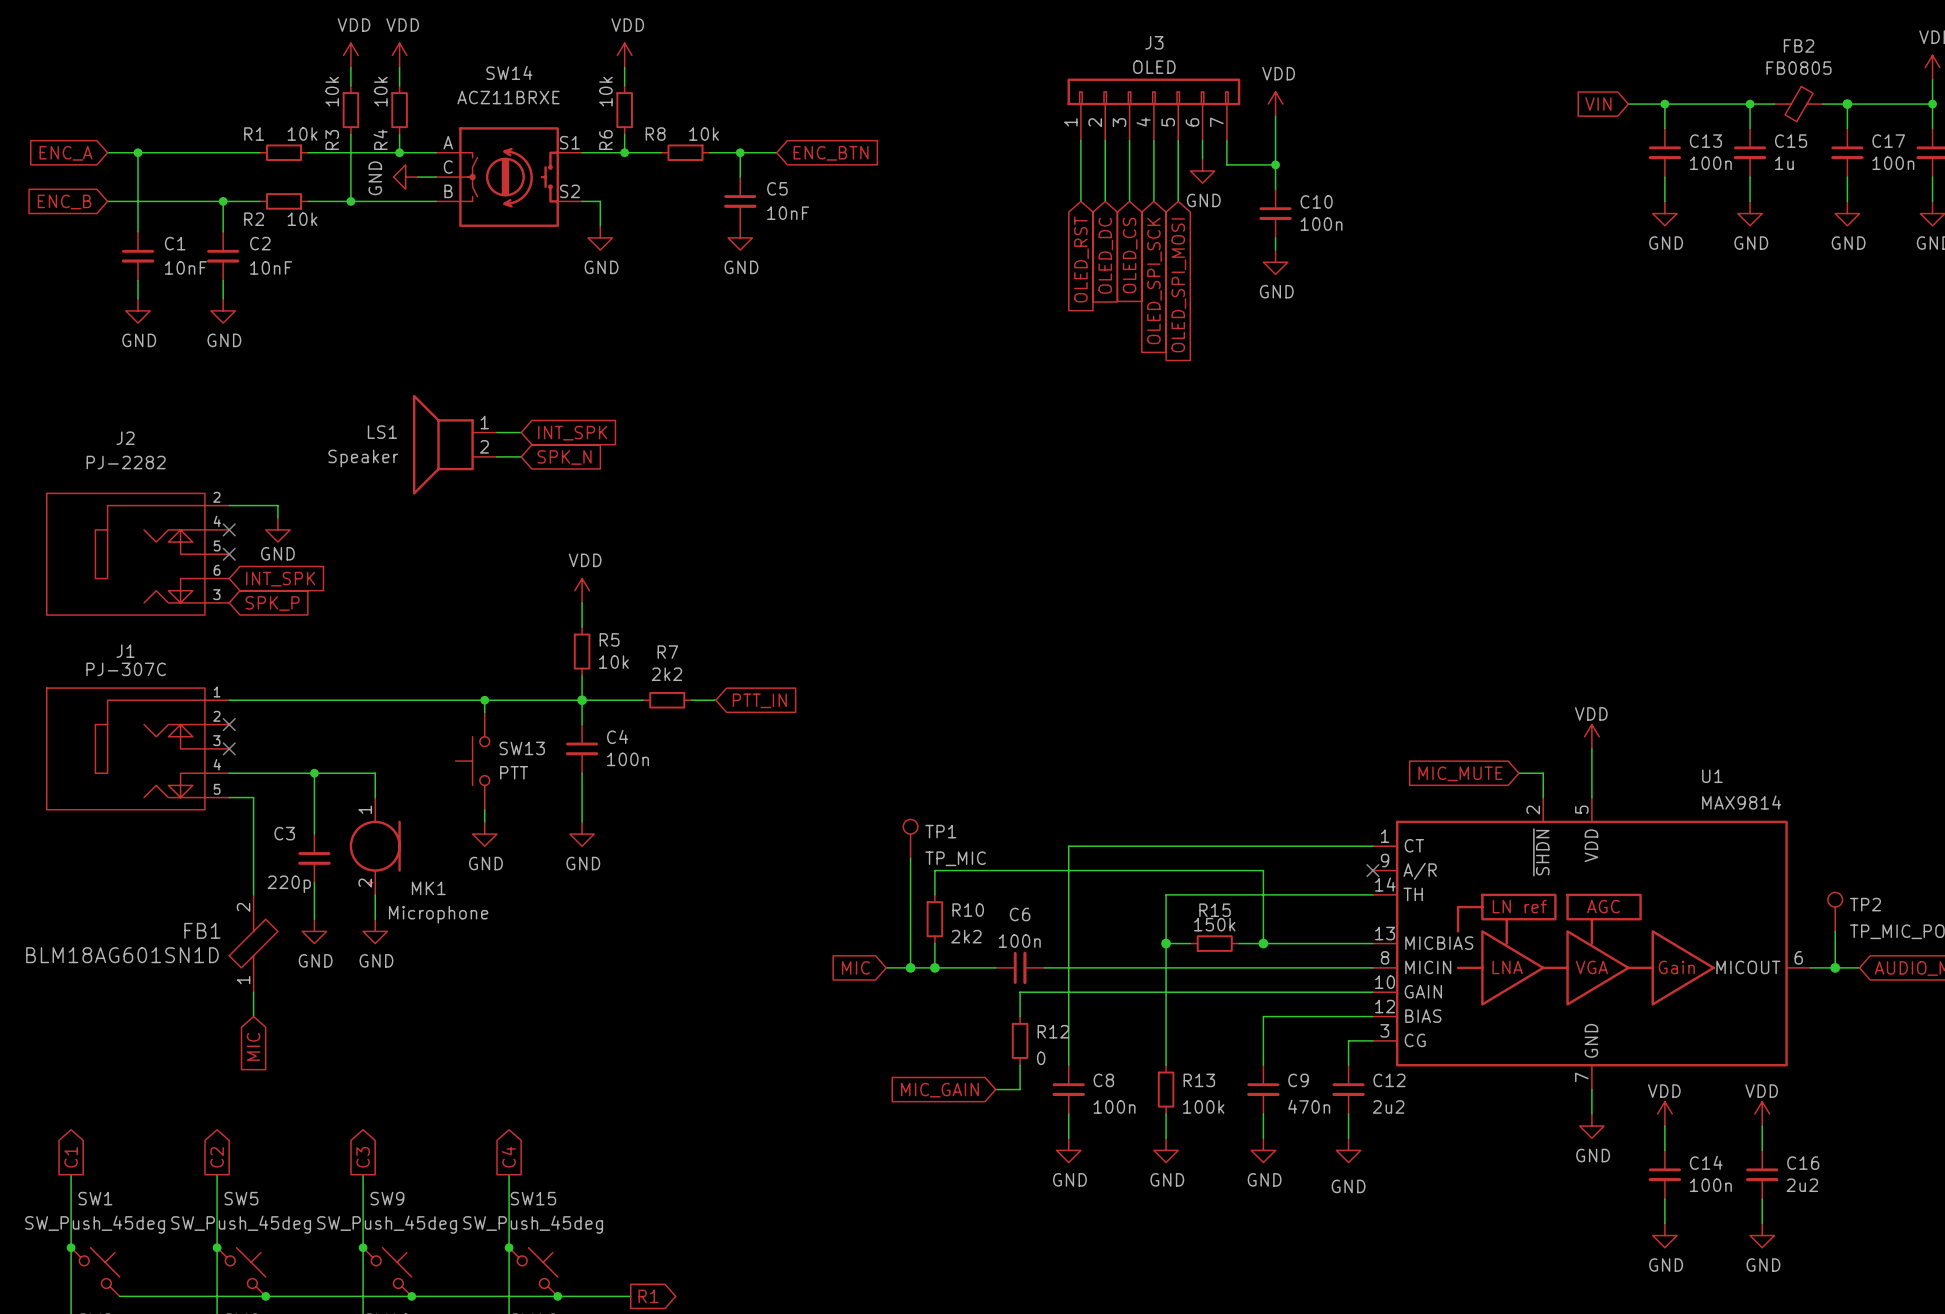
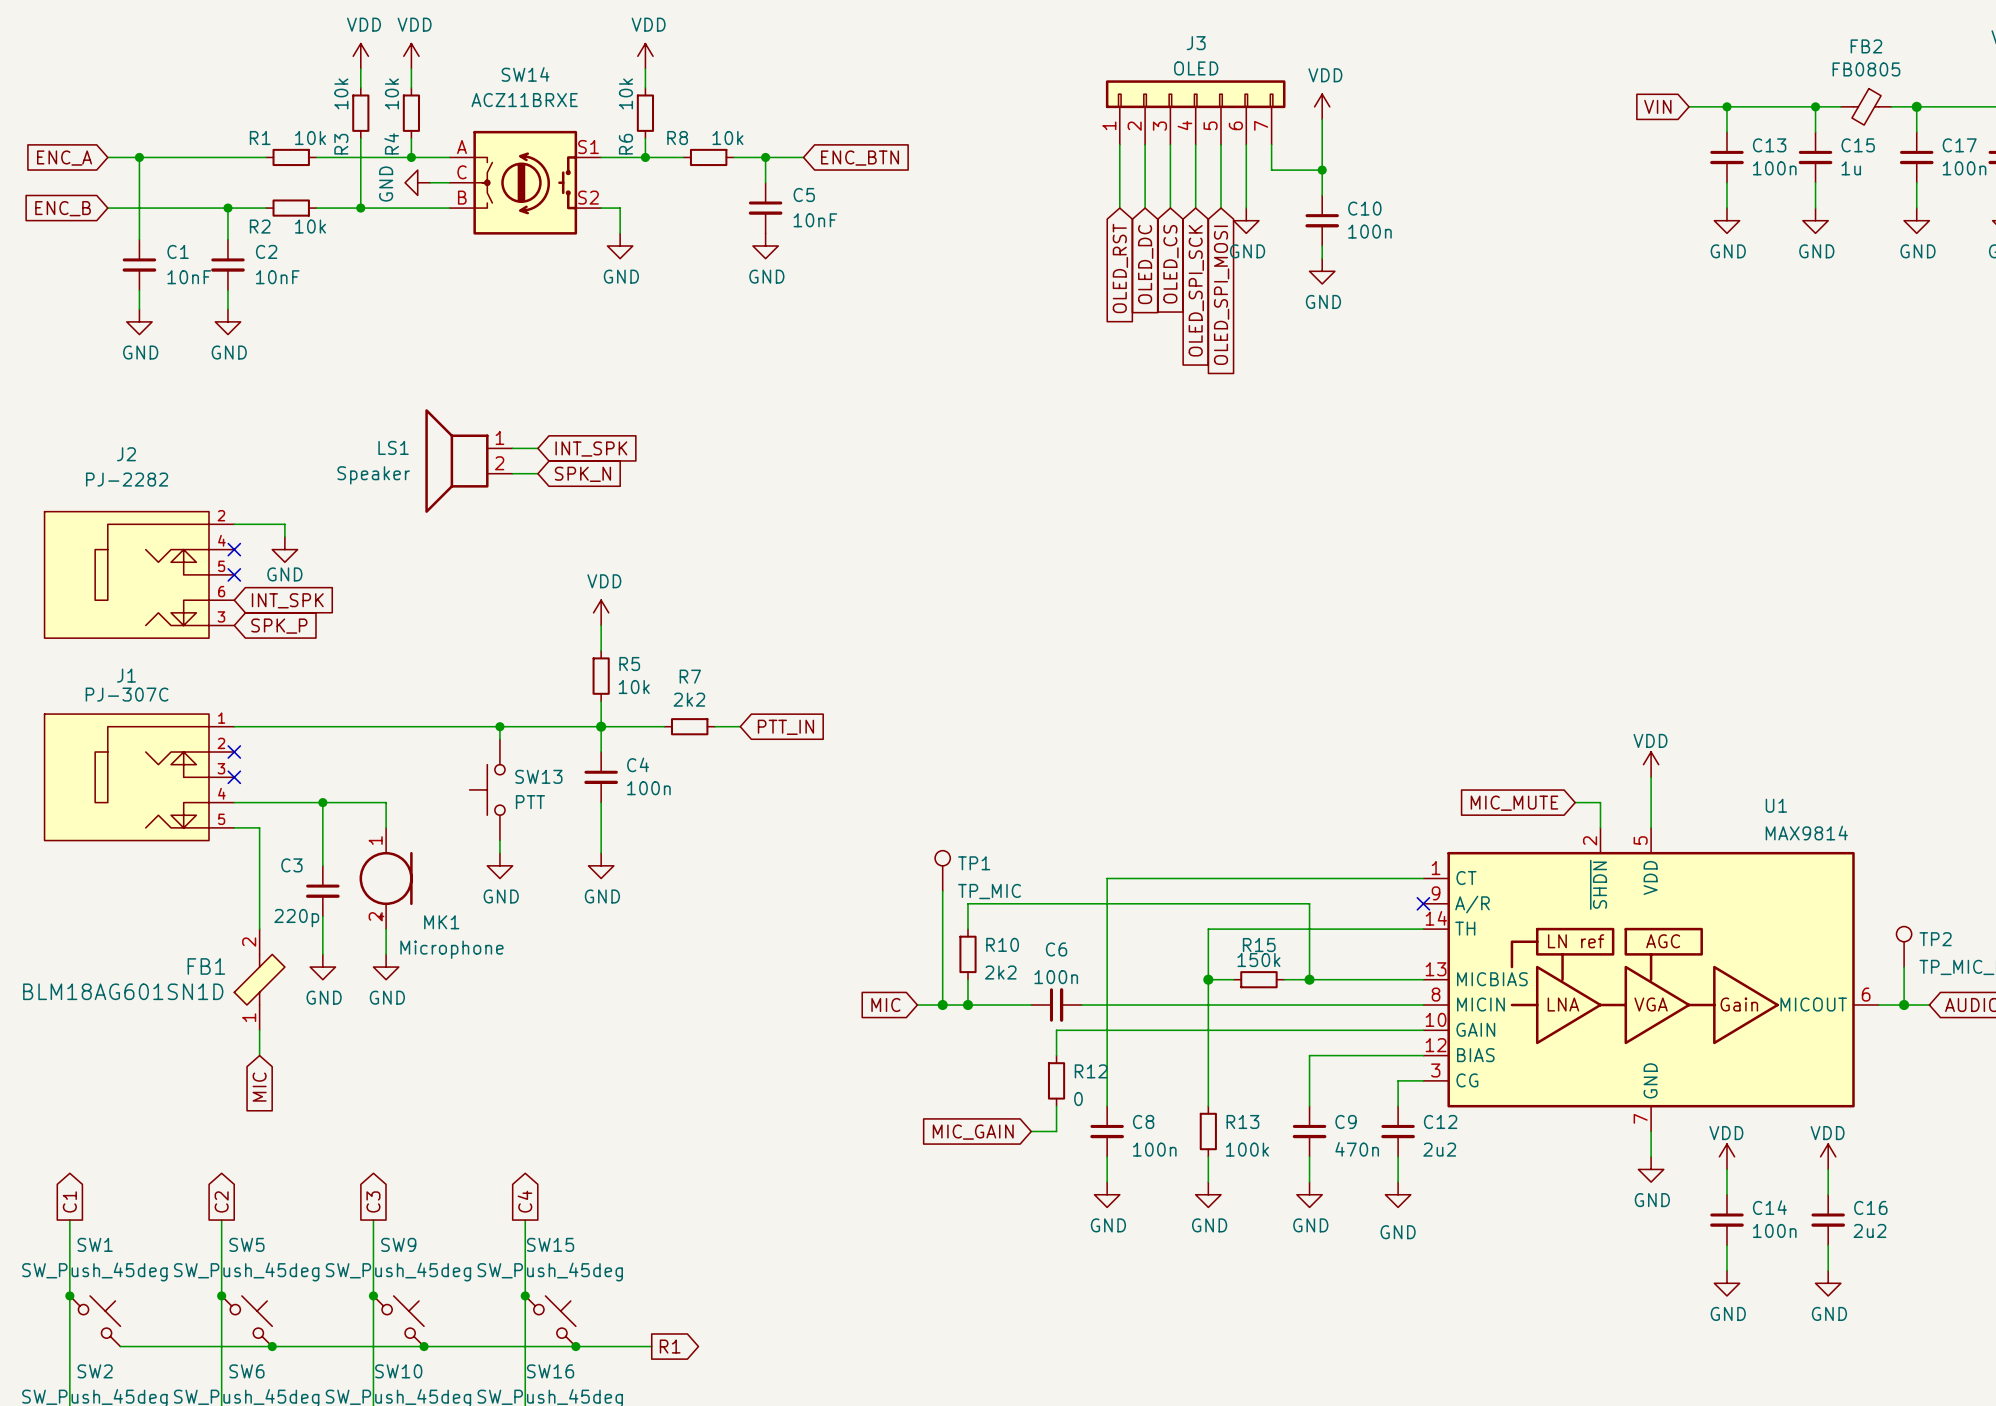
wire: none -> (1246, 163) (1246, 208)
power symbol position: GND (1202, 170) -> GND (1246, 220)

